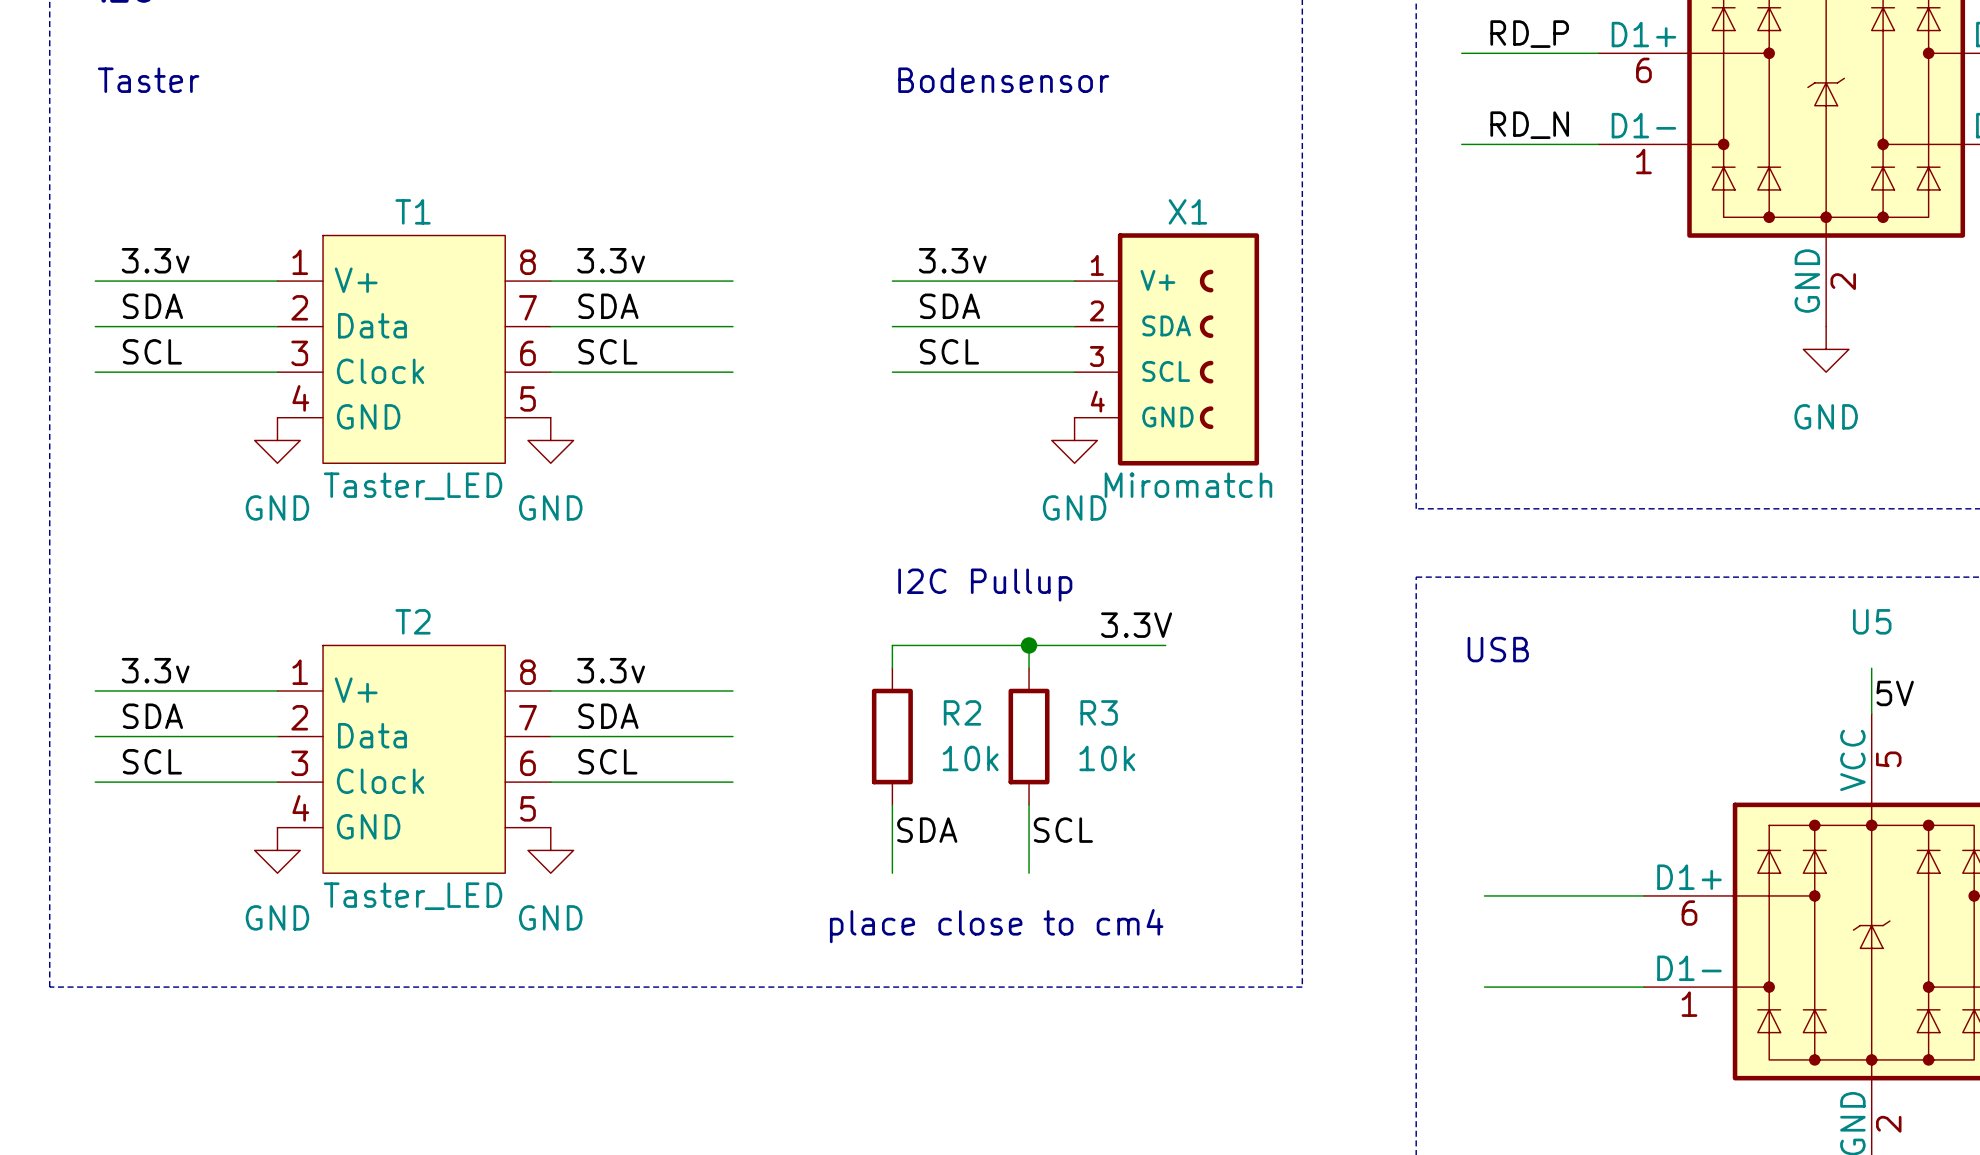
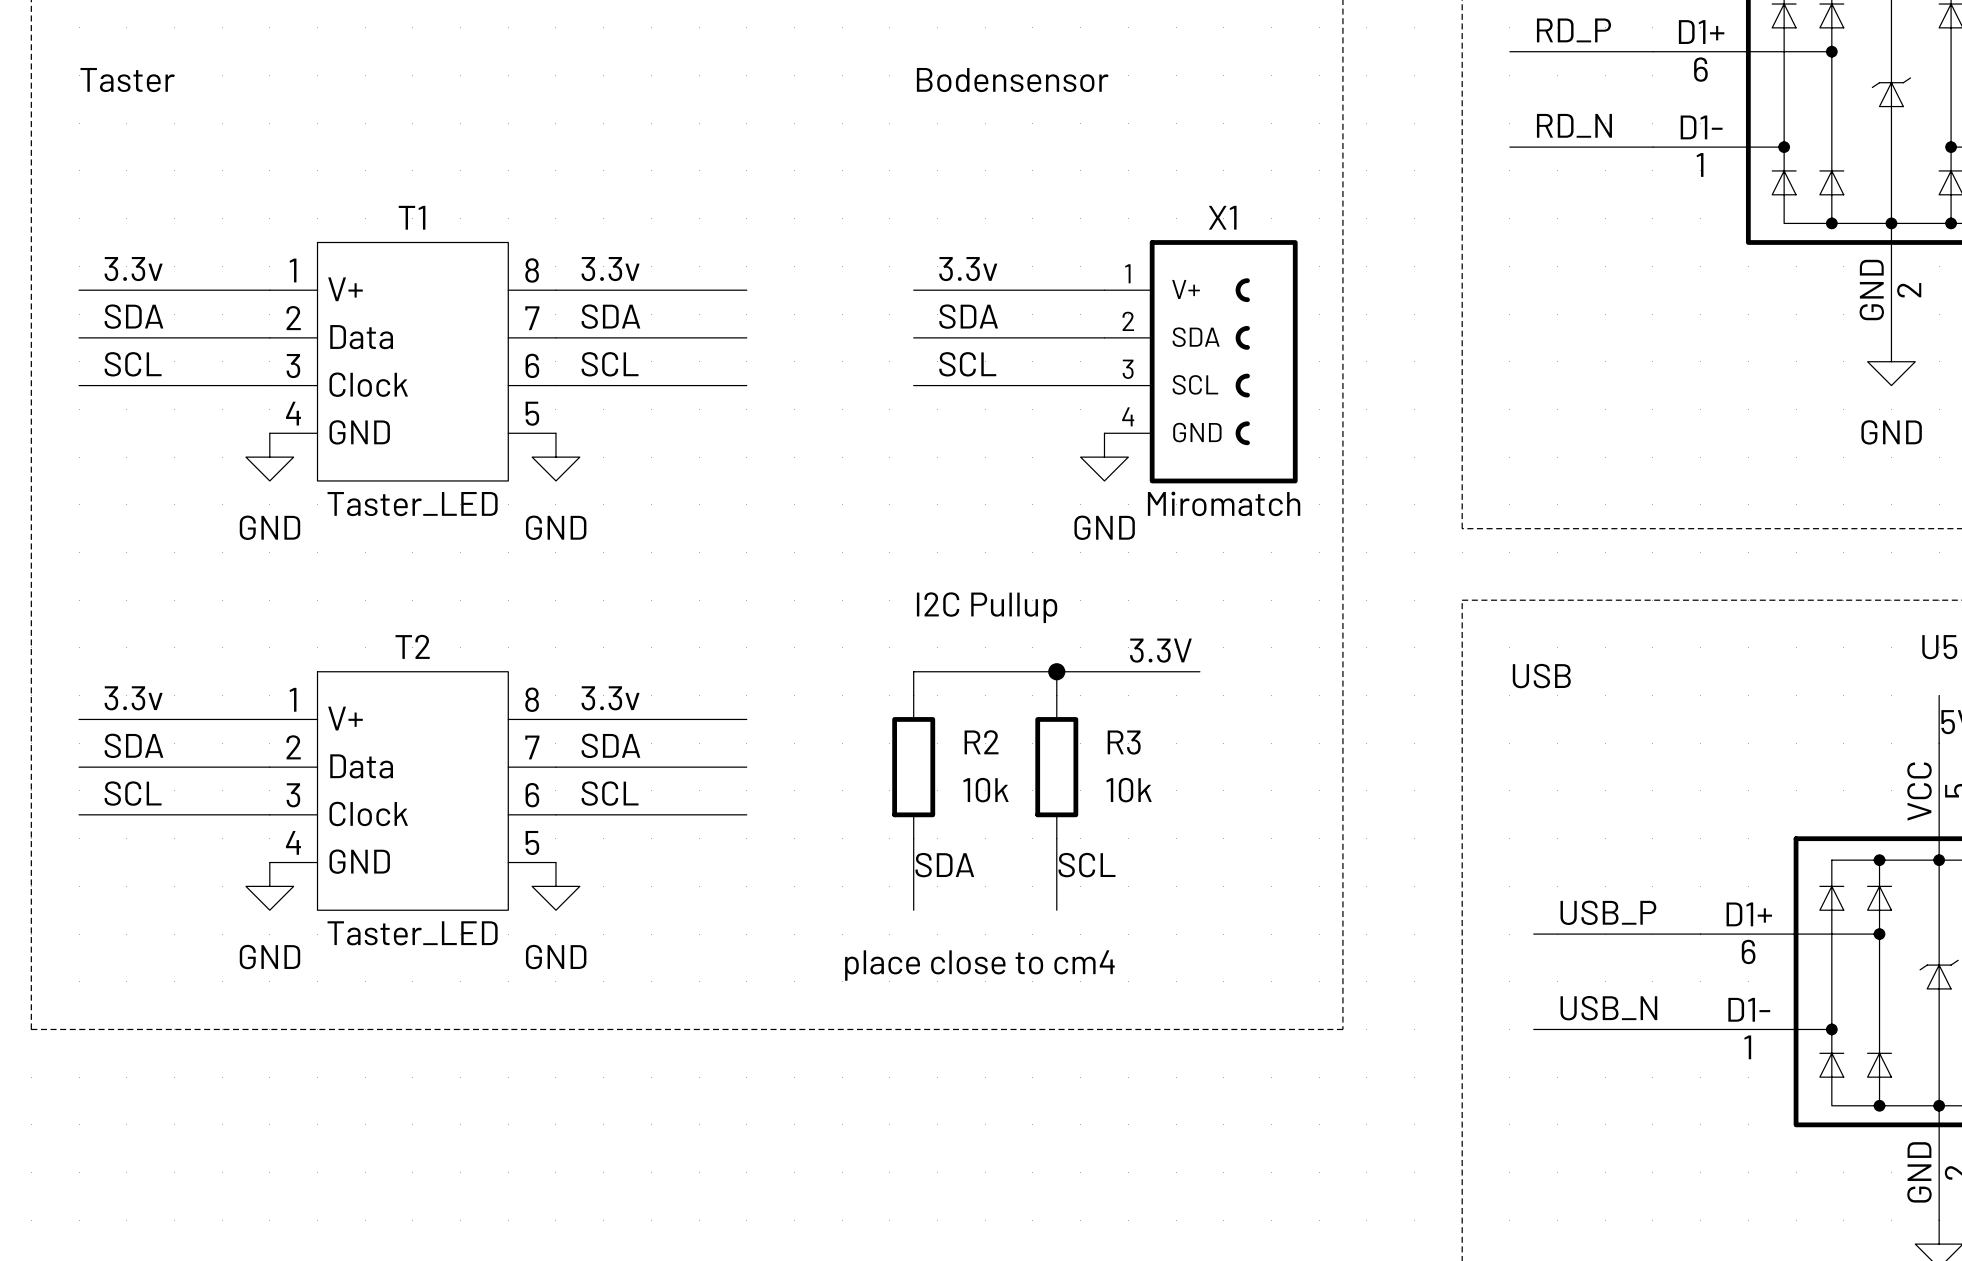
label: none -> USB_P (1608, 912)
label: none -> USB_N (1608, 1008)

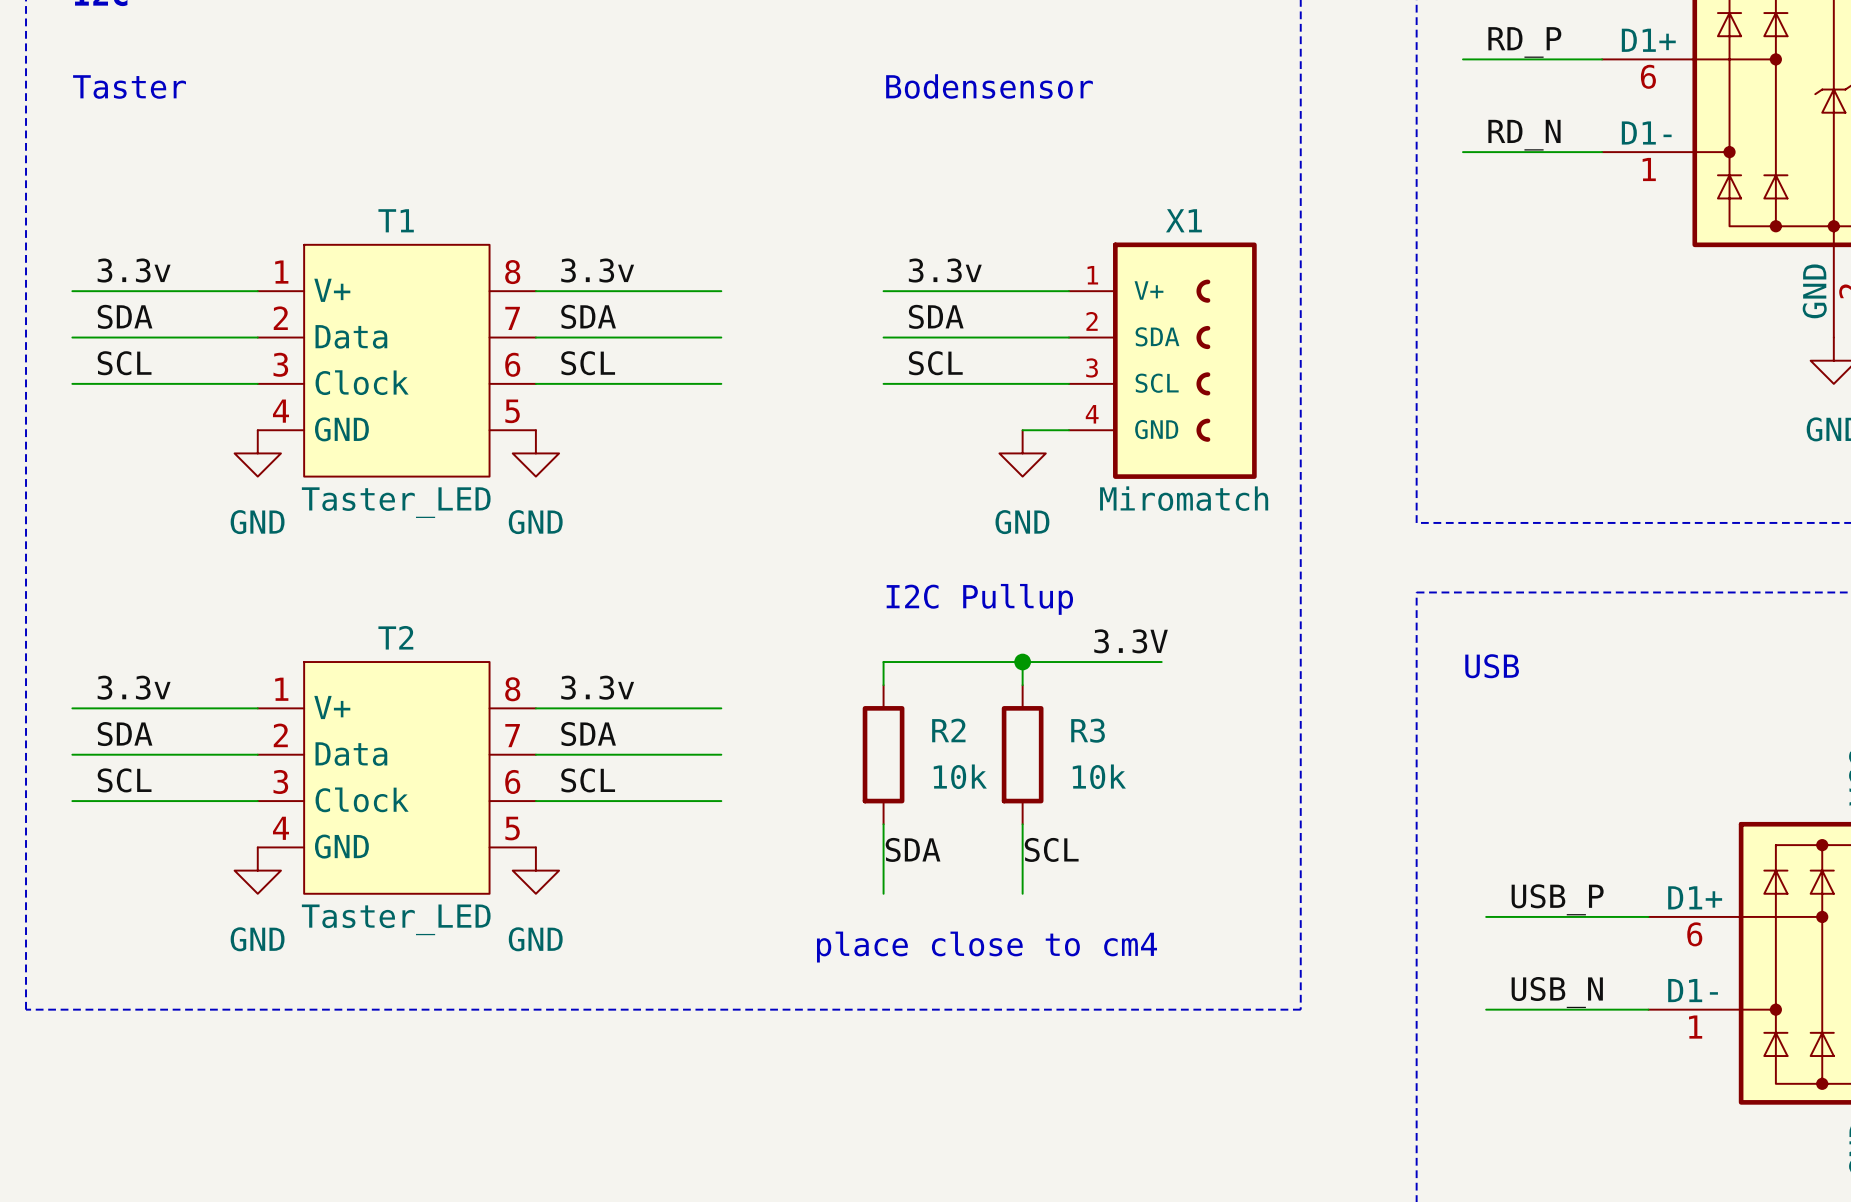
wire: none -> (1022, 430) (1068, 430)
power symbol position: GND (1104, 457) -> GND (1022, 453)

